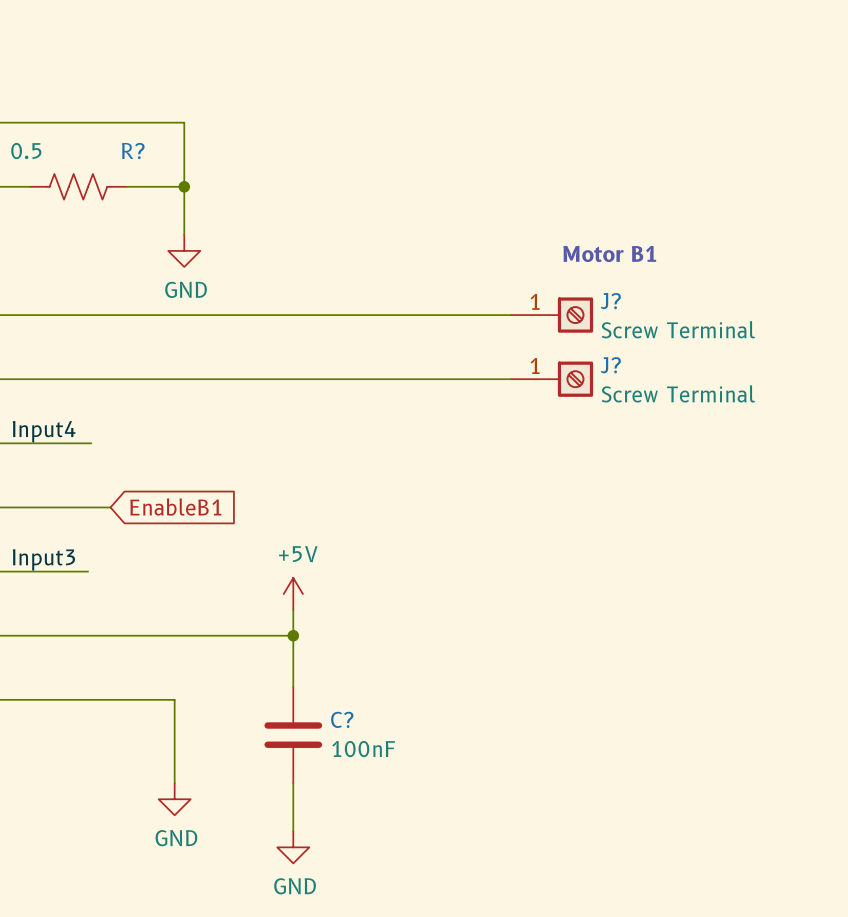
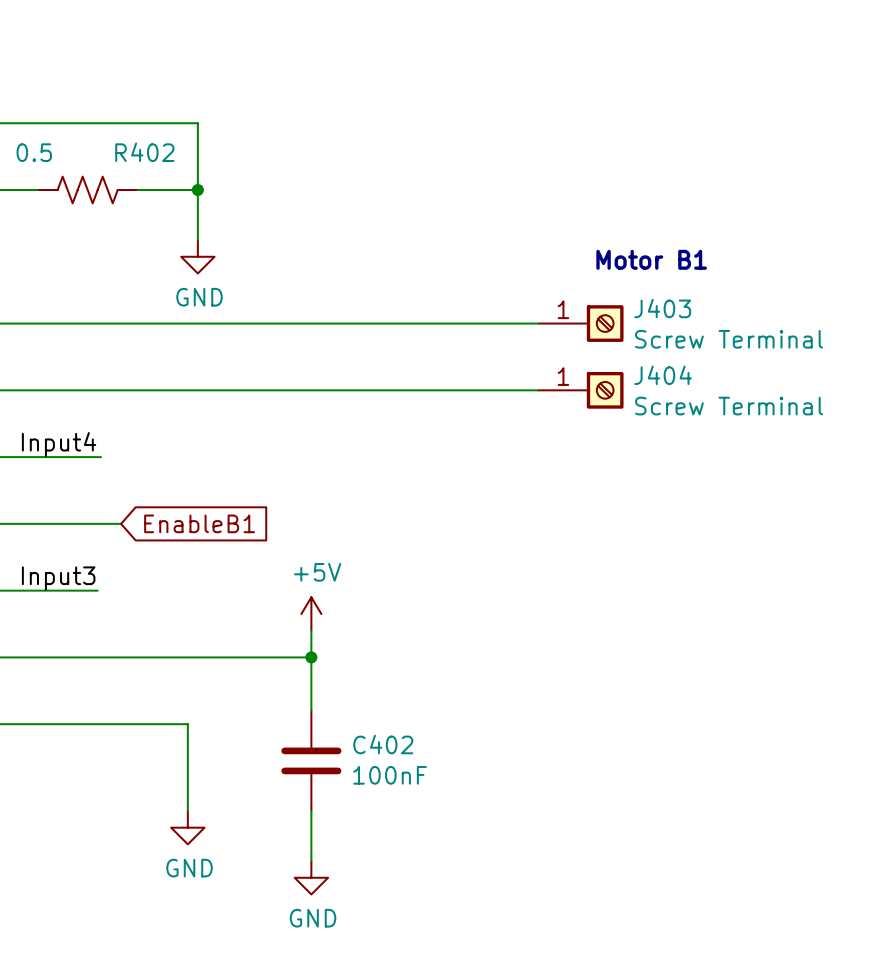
R? name: R? (133, 151) -> R402 (144, 152)
J? name: J? (610, 301) -> J403 (662, 308)
J? name: J? (610, 365) -> J404 (663, 375)
C? name: C? (342, 719) -> C402 (383, 744)

